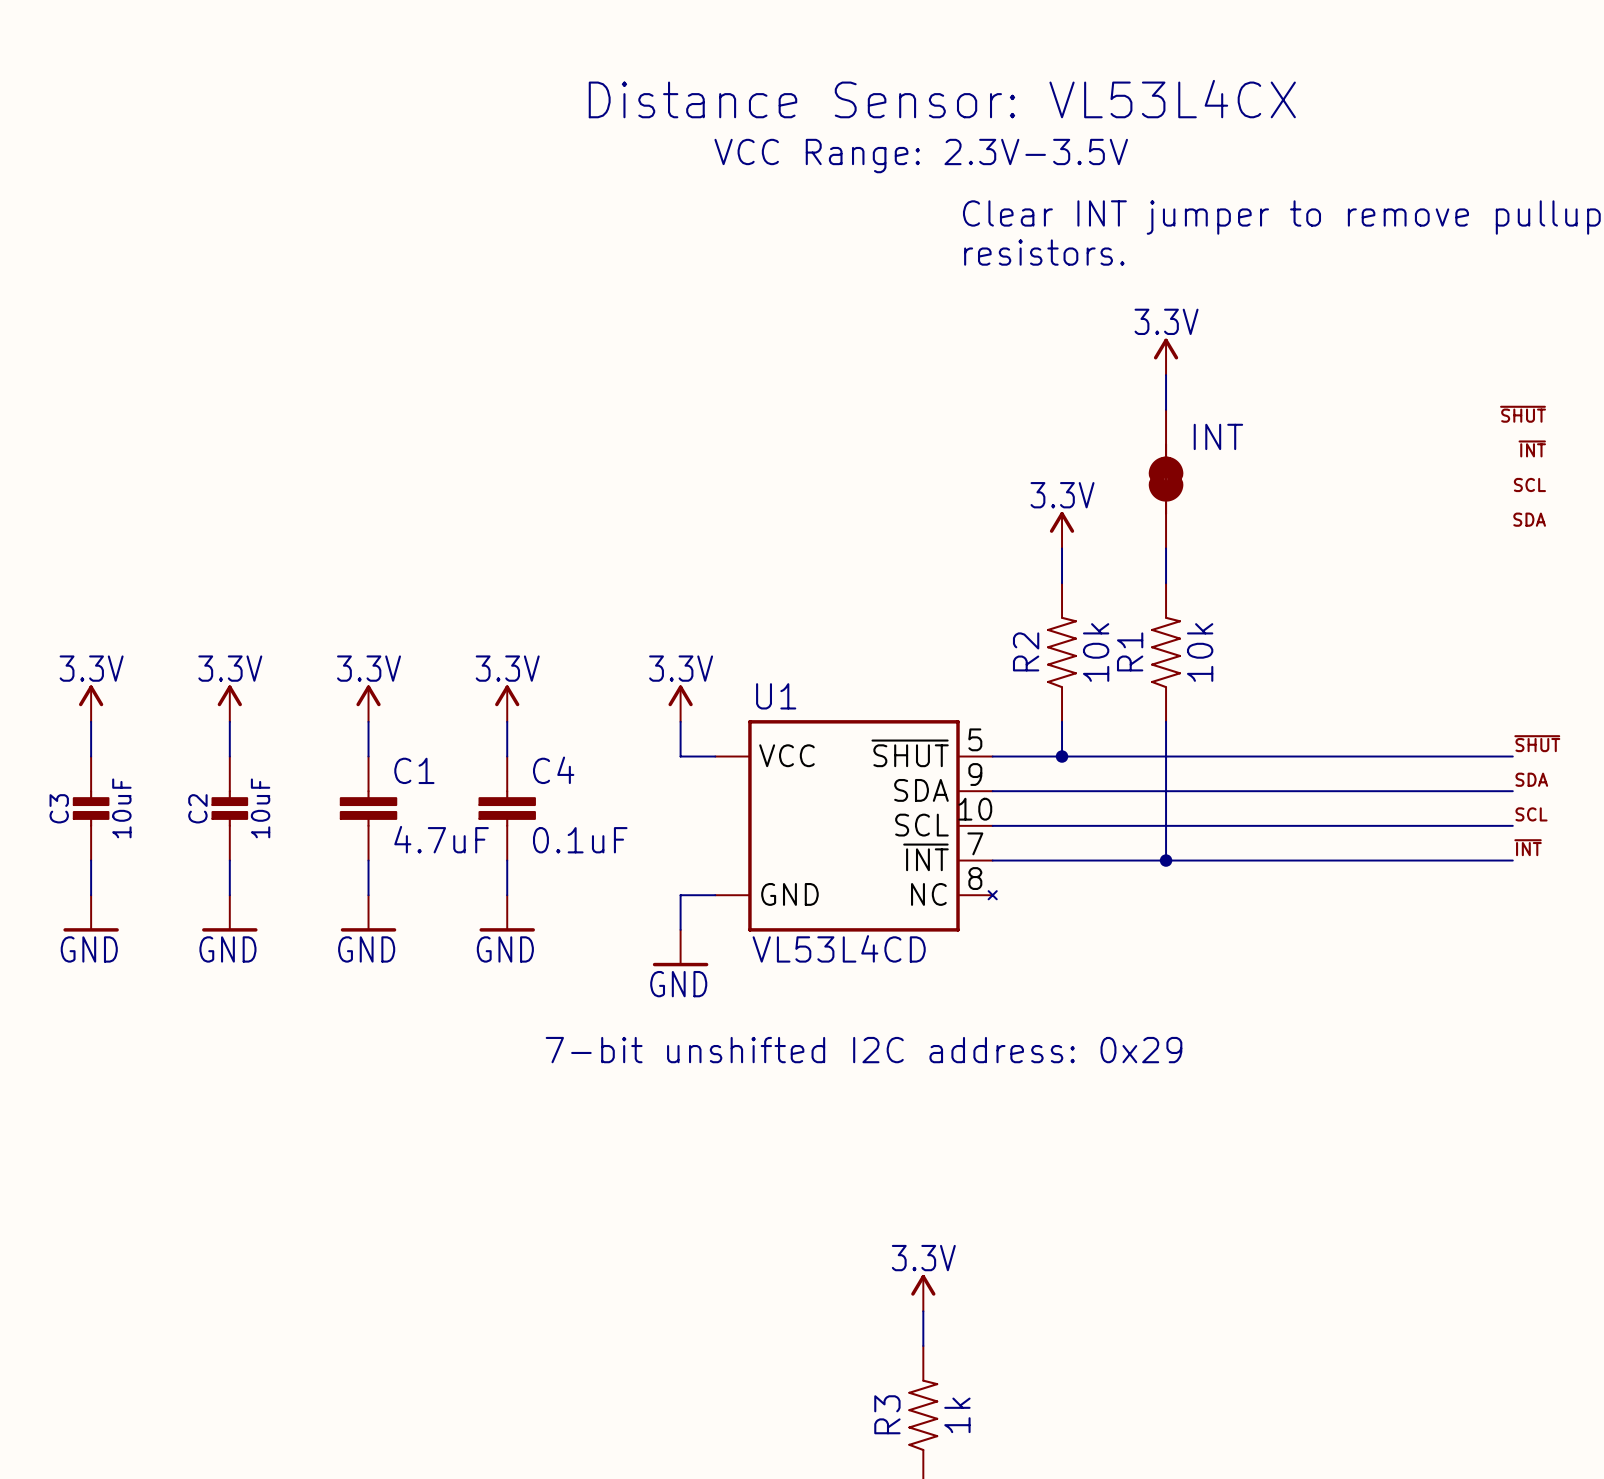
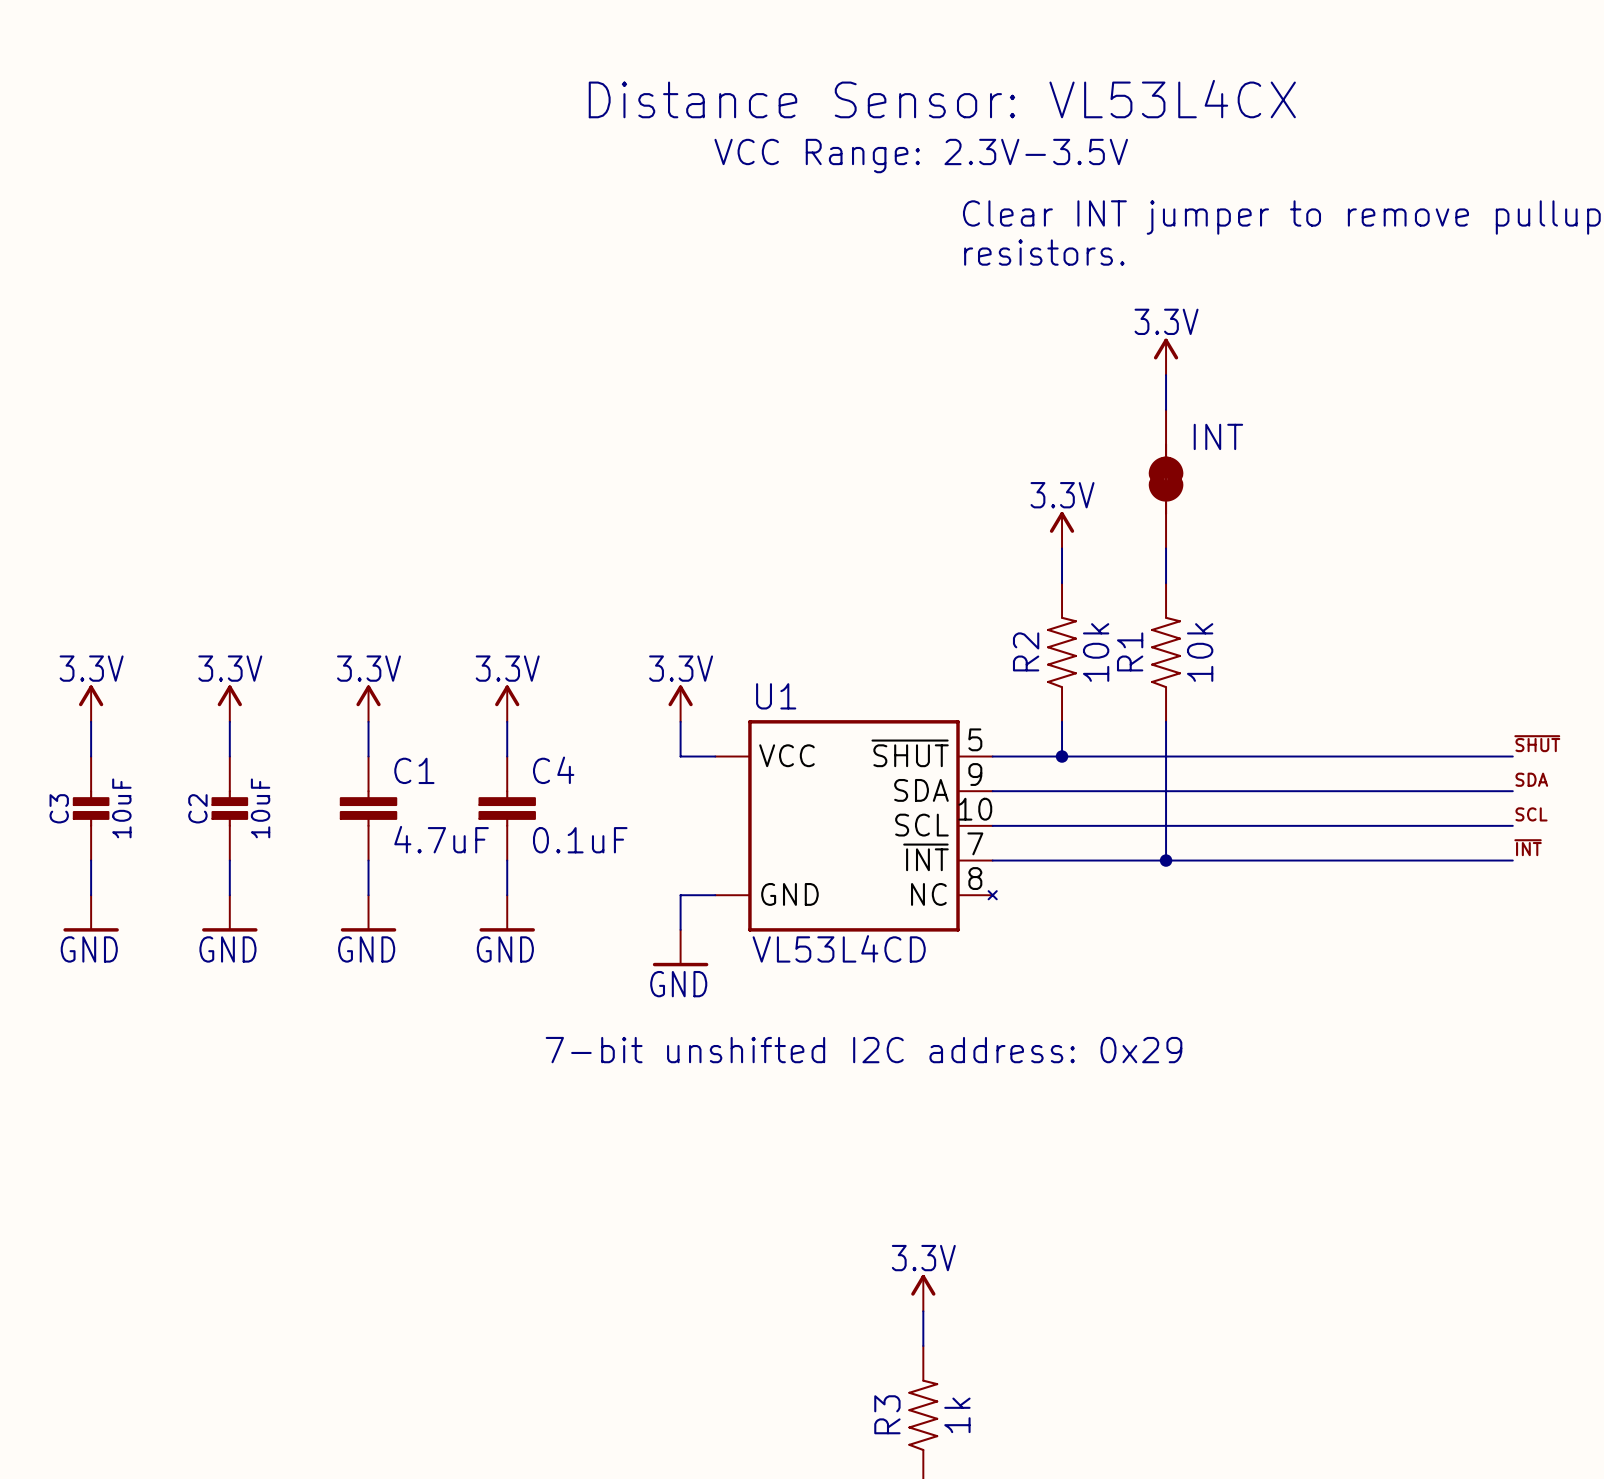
label: ~{SHUT} (1523, 414) -> none
label: ~{INT} (1532, 448) -> none
label: SCL (1529, 484) -> none
label: SDA (1529, 519) -> none

